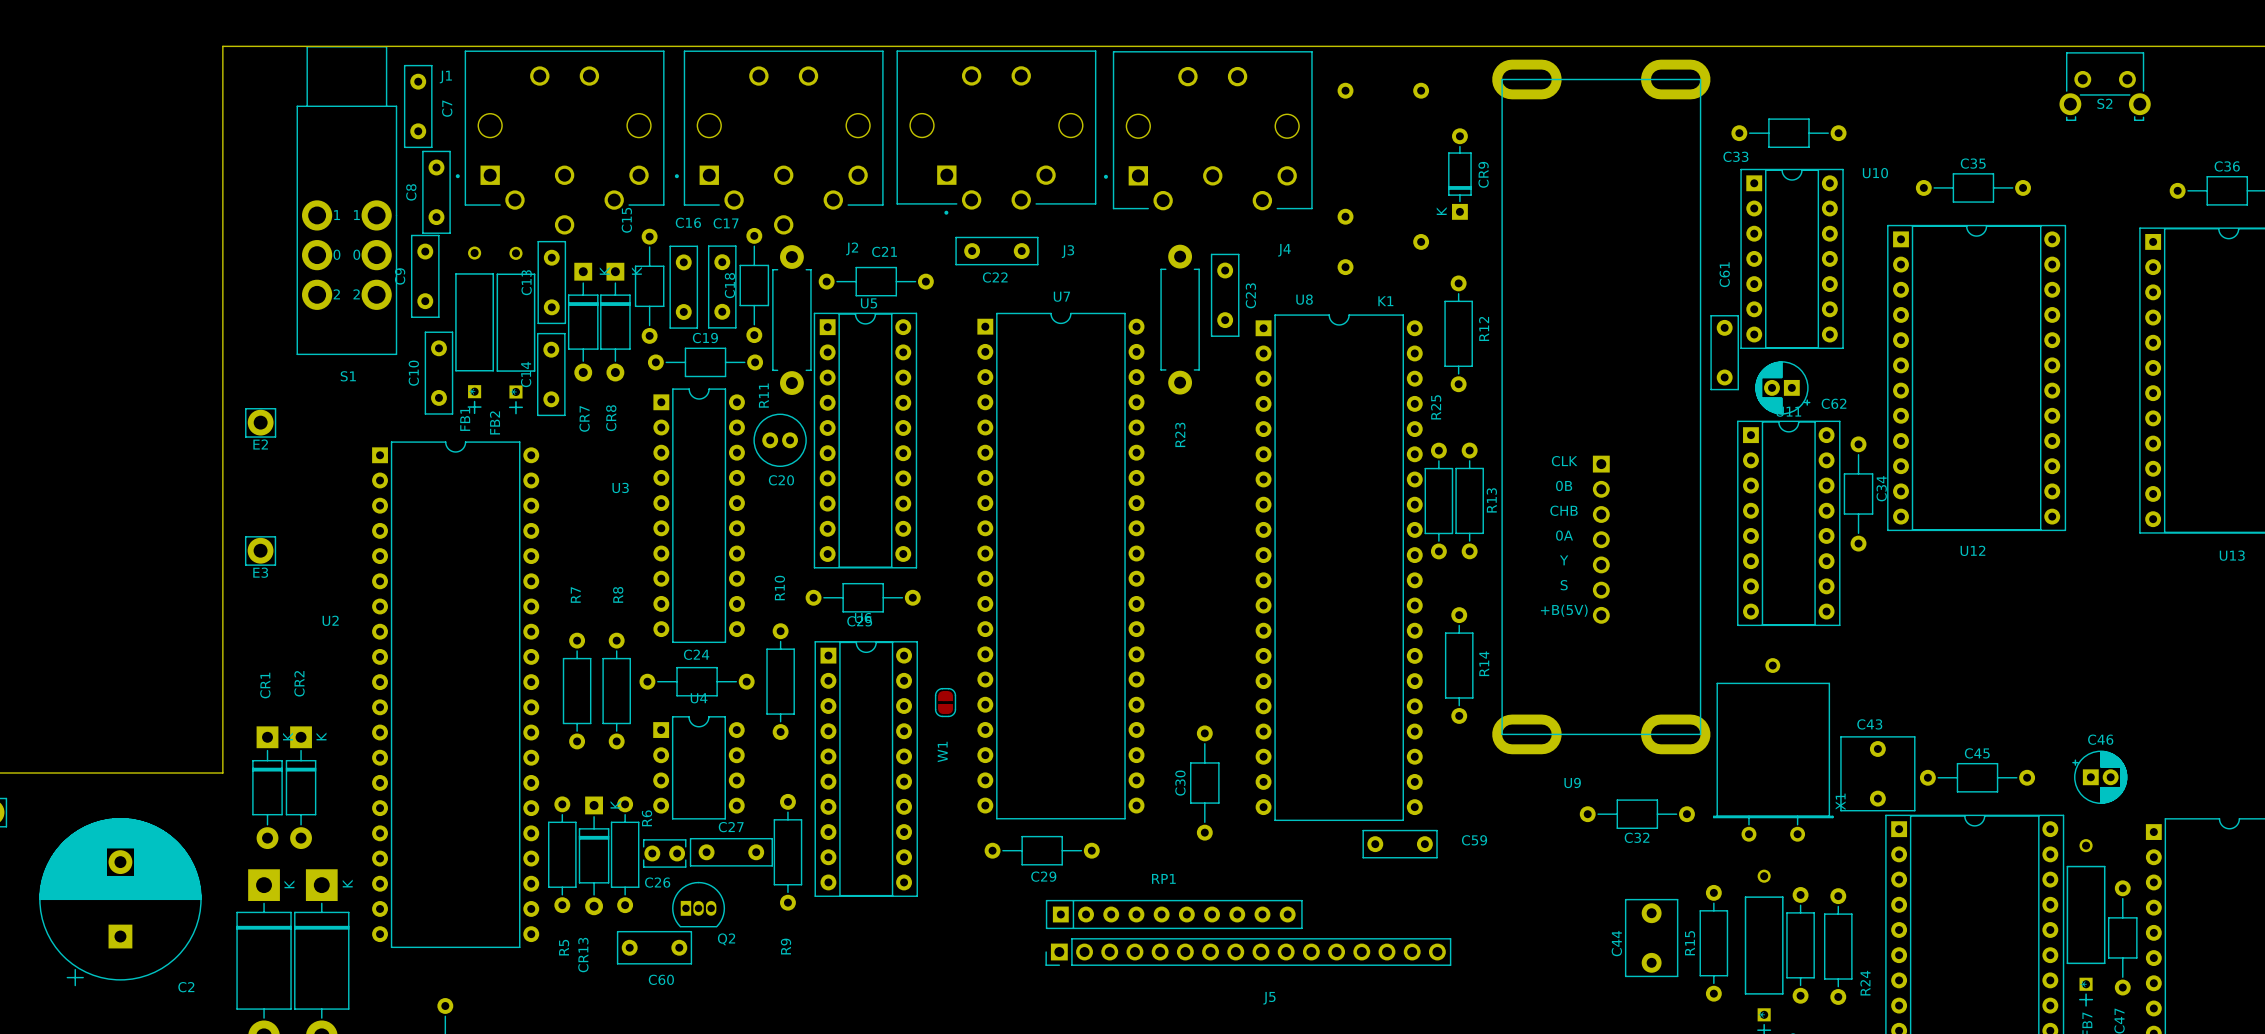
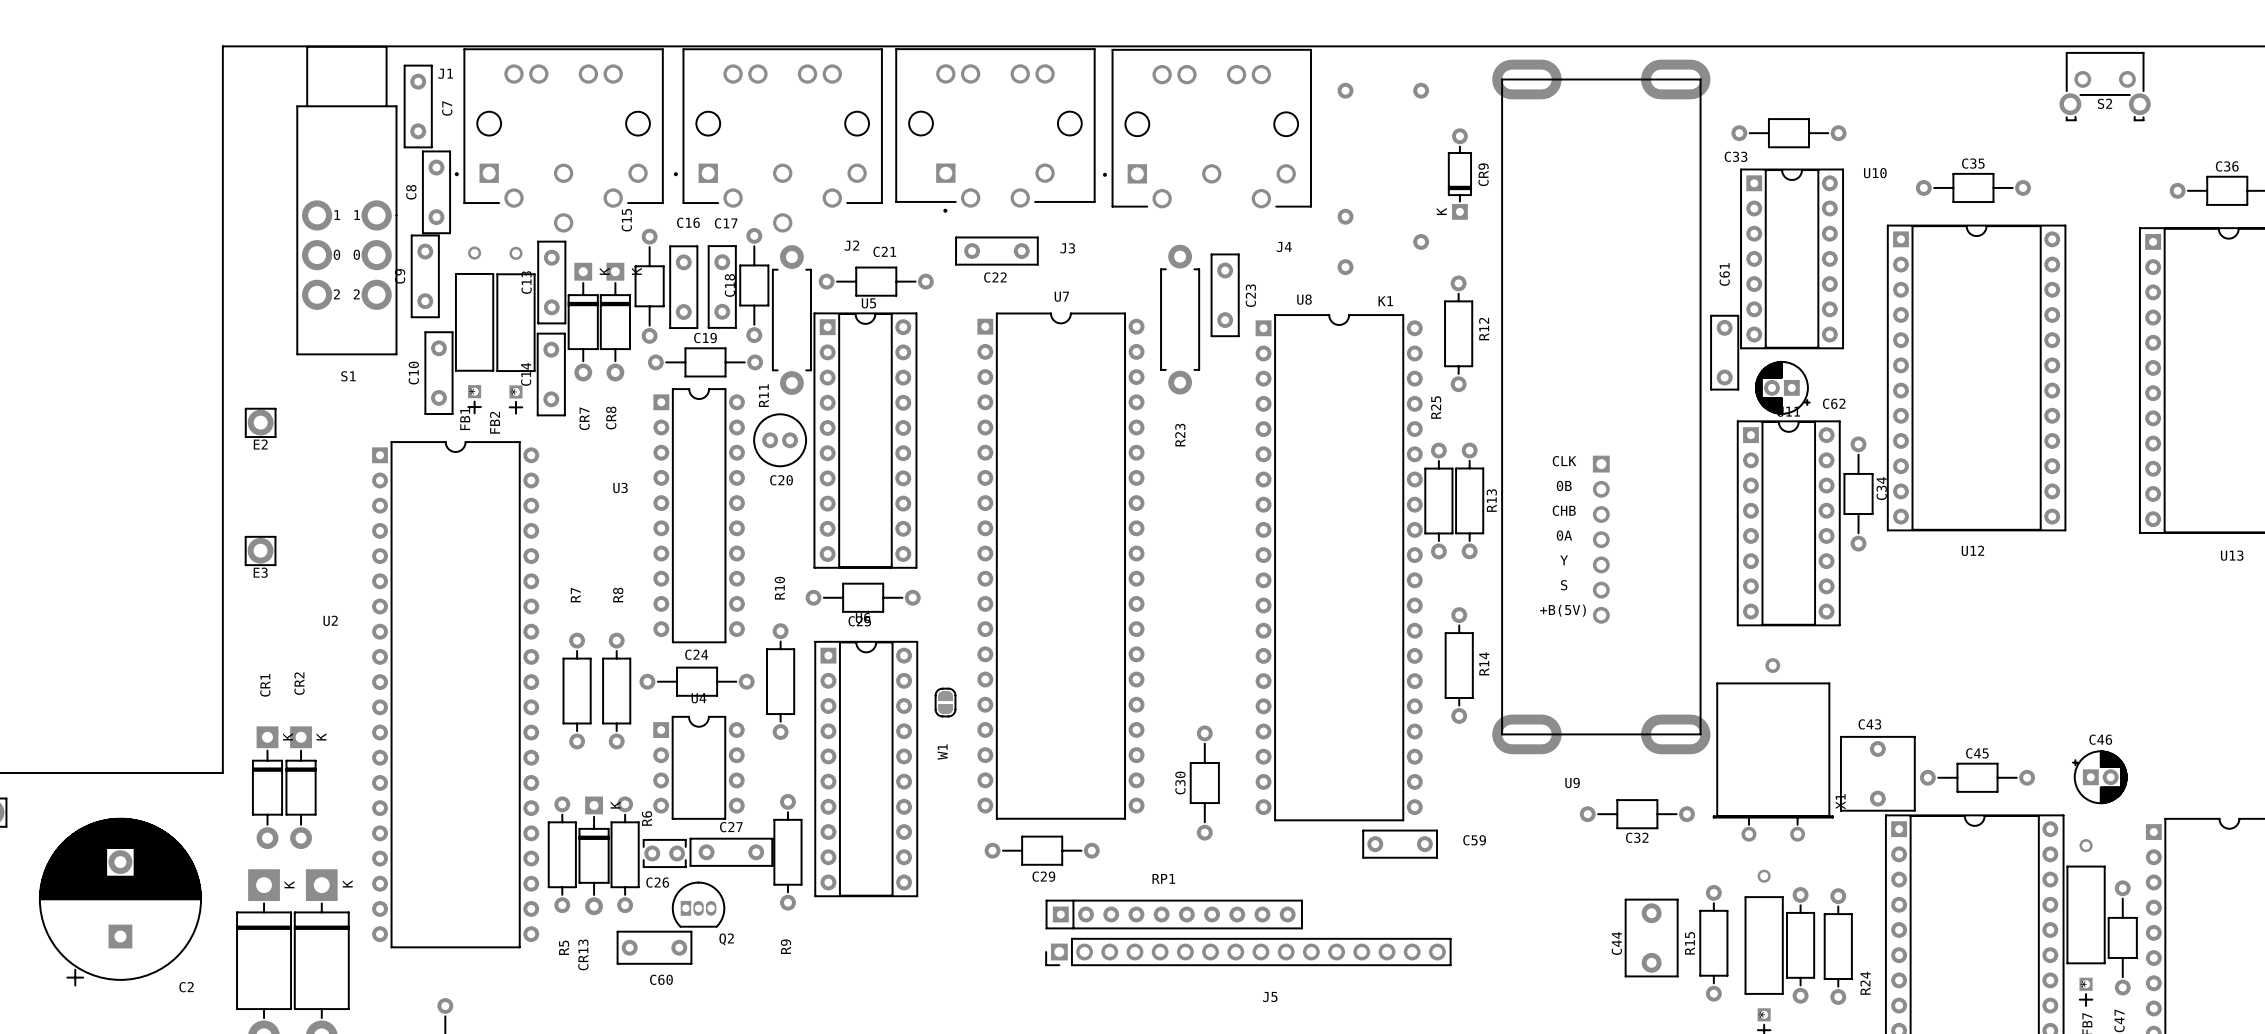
J1 footprint: [455, 50, 665, 235] -> [454, 48, 664, 233]
J2 footprint: [674, 50, 884, 235] -> [673, 48, 883, 233]
J3 footprint: [896, 50, 1097, 215] -> [895, 48, 1096, 213]
J4 footprint: [1103, 51, 1313, 211] -> [1102, 49, 1312, 209]

